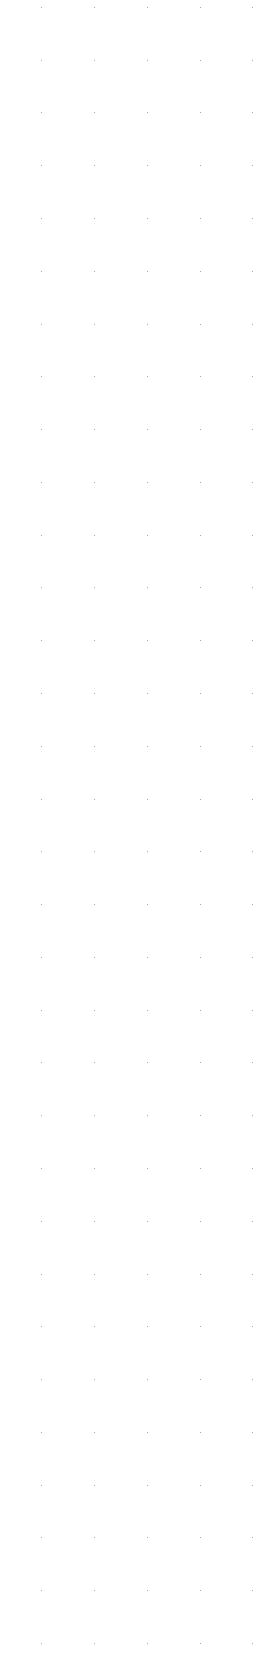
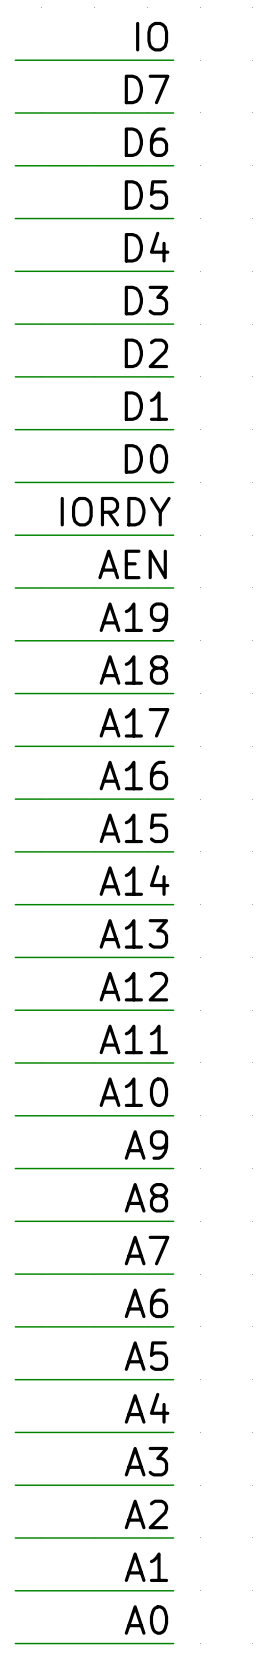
label: none -> IO (152, 36)
wire: none -> (15, 60) (173, 60)
label: none -> D7 (147, 89)
wire: none -> (15, 112) (173, 112)
label: none -> D6 (146, 142)
wire: none -> (15, 165) (173, 165)
label: none -> D5 (146, 195)
wire: none -> (15, 218) (173, 218)
label: none -> D4 (147, 247)
wire: none -> (15, 271) (173, 271)
label: none -> D3 (146, 300)
wire: none -> (15, 324) (173, 324)
label: none -> D2 (146, 353)
wire: none -> (15, 376) (173, 376)
label: none -> D1 (146, 406)
wire: none -> (15, 429) (173, 429)
label: none -> D0 (146, 458)
wire: none -> (15, 482) (173, 482)
label: none -> IORDY (115, 511)
wire: none -> (15, 535) (173, 535)
label: none -> AEN (132, 564)
wire: none -> (15, 587) (173, 587)
label: none -> A19 (133, 617)
wire: none -> (15, 640) (173, 640)
label: none -> A18 (133, 670)
wire: none -> (15, 693) (173, 693)
label: none -> A17 (134, 722)
wire: none -> (15, 746) (173, 746)
label: none -> A16 (133, 775)
wire: none -> (15, 799) (173, 799)
label: none -> A15 (133, 828)
wire: none -> (15, 851) (173, 851)
label: none -> A14 (134, 880)
wire: none -> (15, 904) (173, 904)
label: none -> A13 (133, 933)
wire: none -> (15, 957) (173, 957)
label: none -> A12 (133, 986)
wire: none -> (15, 1010) (173, 1010)
label: none -> A11 (133, 1039)
wire: none -> (15, 1062) (173, 1062)
label: none -> A10 (133, 1092)
wire: none -> (15, 1115) (173, 1115)
label: none -> A9 (146, 1145)
wire: none -> (15, 1168) (173, 1168)
label: none -> A8 (146, 1197)
wire: none -> (15, 1221) (173, 1221)
label: none -> A7 (147, 1250)
wire: none -> (15, 1274) (173, 1274)
label: none -> A6 (146, 1303)
wire: none -> (15, 1326) (173, 1326)
label: none -> A5 (146, 1356)
wire: none -> (15, 1379) (173, 1379)
label: none -> A4 (147, 1408)
wire: none -> (15, 1432) (173, 1432)
label: none -> A3 (146, 1461)
wire: none -> (15, 1485) (173, 1485)
label: none -> A2 (146, 1514)
wire: none -> (15, 1537) (173, 1537)
label: none -> A1 (146, 1567)
wire: none -> (15, 1590) (173, 1590)
label: none -> A0 (146, 1620)
wire: none -> (15, 1643) (173, 1643)

